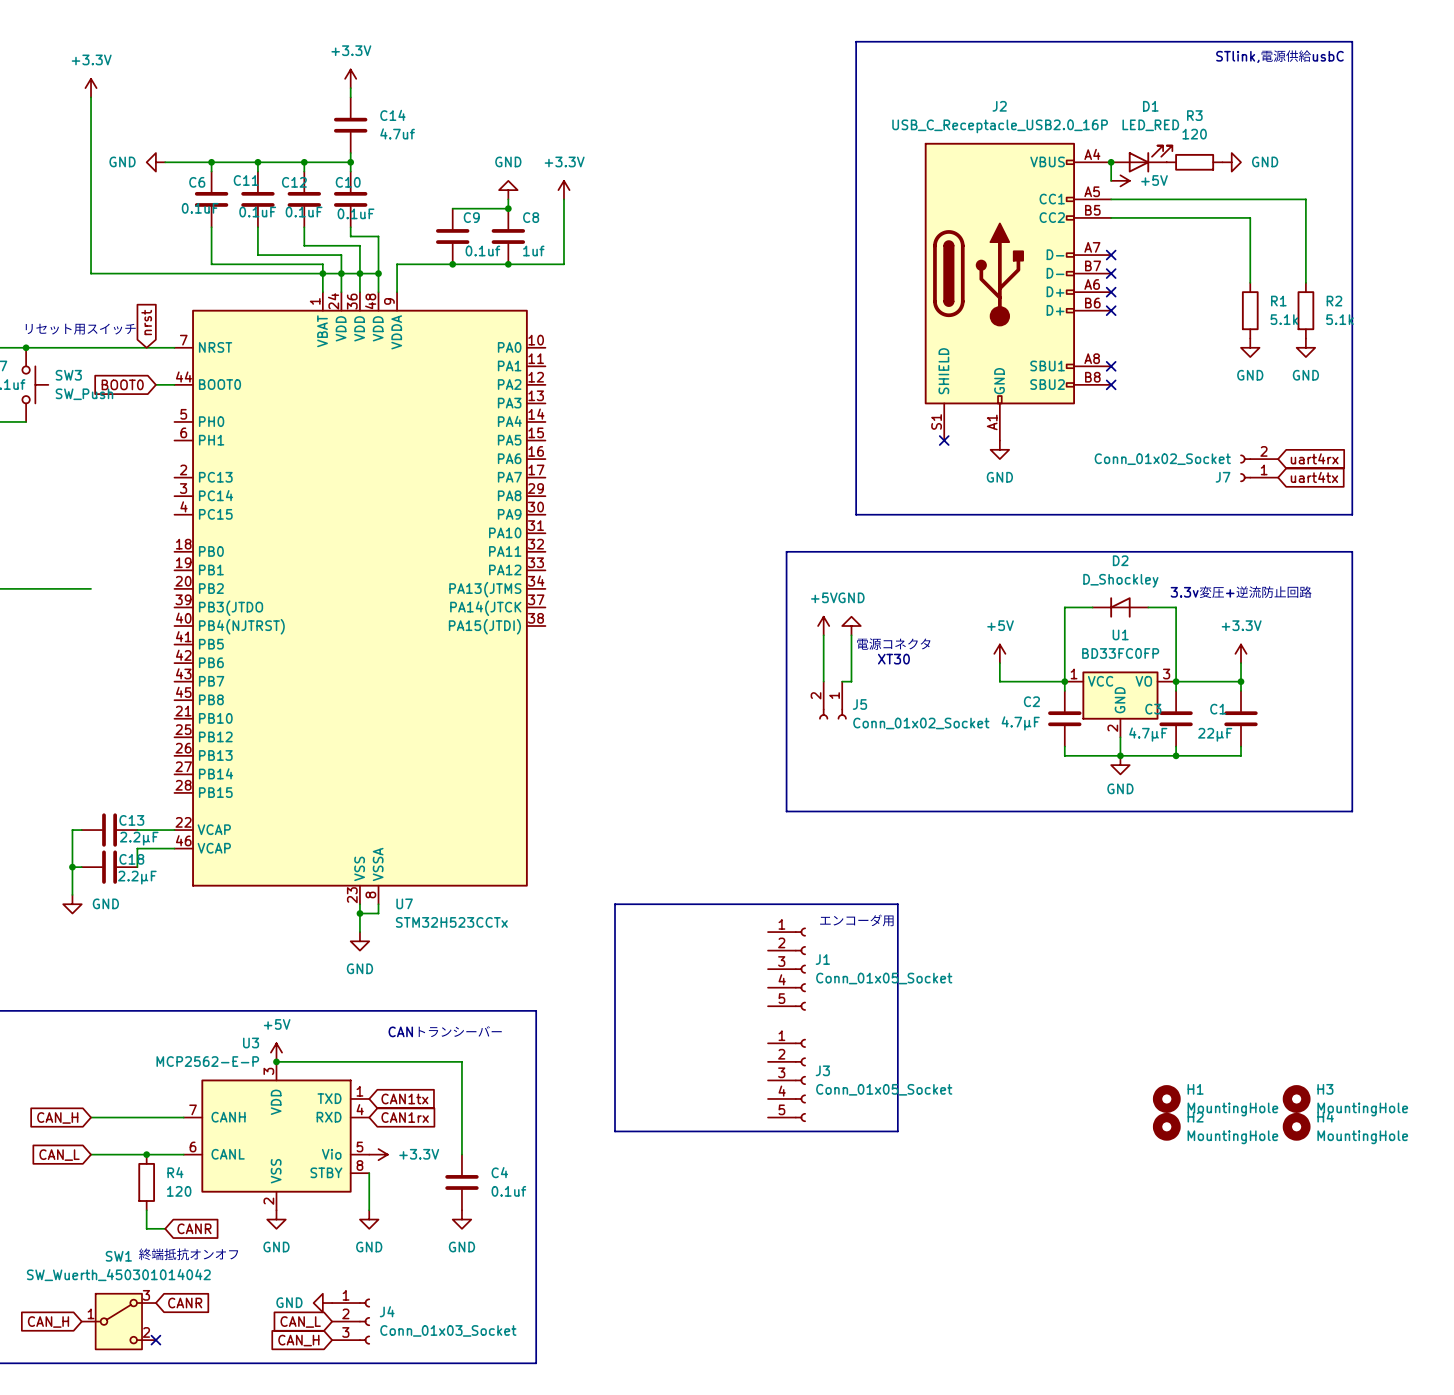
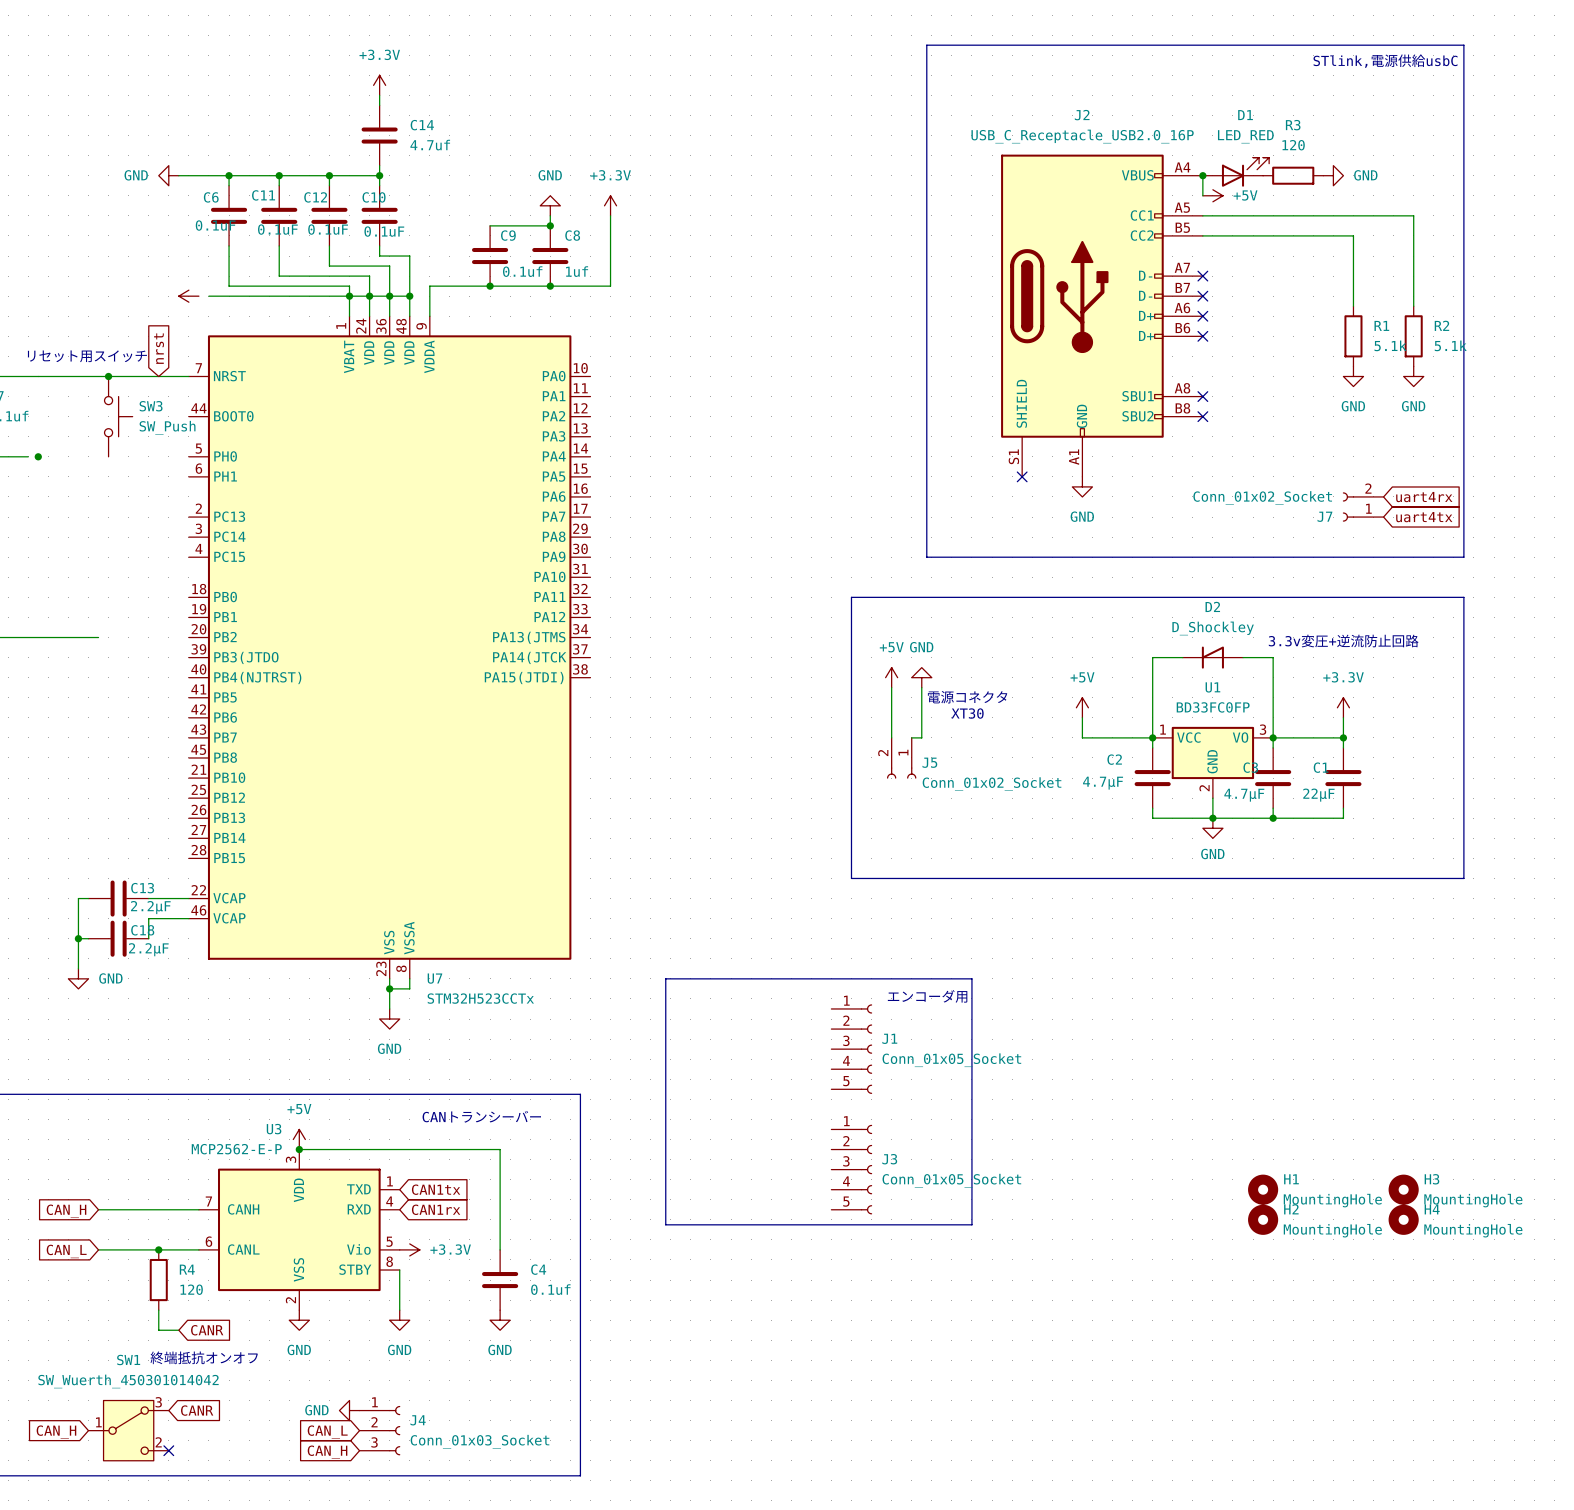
power symbol: +3.3V (91, 88) -> none
wire: (91, 97) (91, 273) (193, 273) -> none
power symbol: none -> (188, 296)
junction: (26, 347) -> none
junction: none -> (108, 376)
SW3 position: (35, 384) -> (118, 416)
global label: BOOT0 (122, 384) -> none
wire: (155, 384) (174, 384) -> none
junction: none -> (38, 456)

